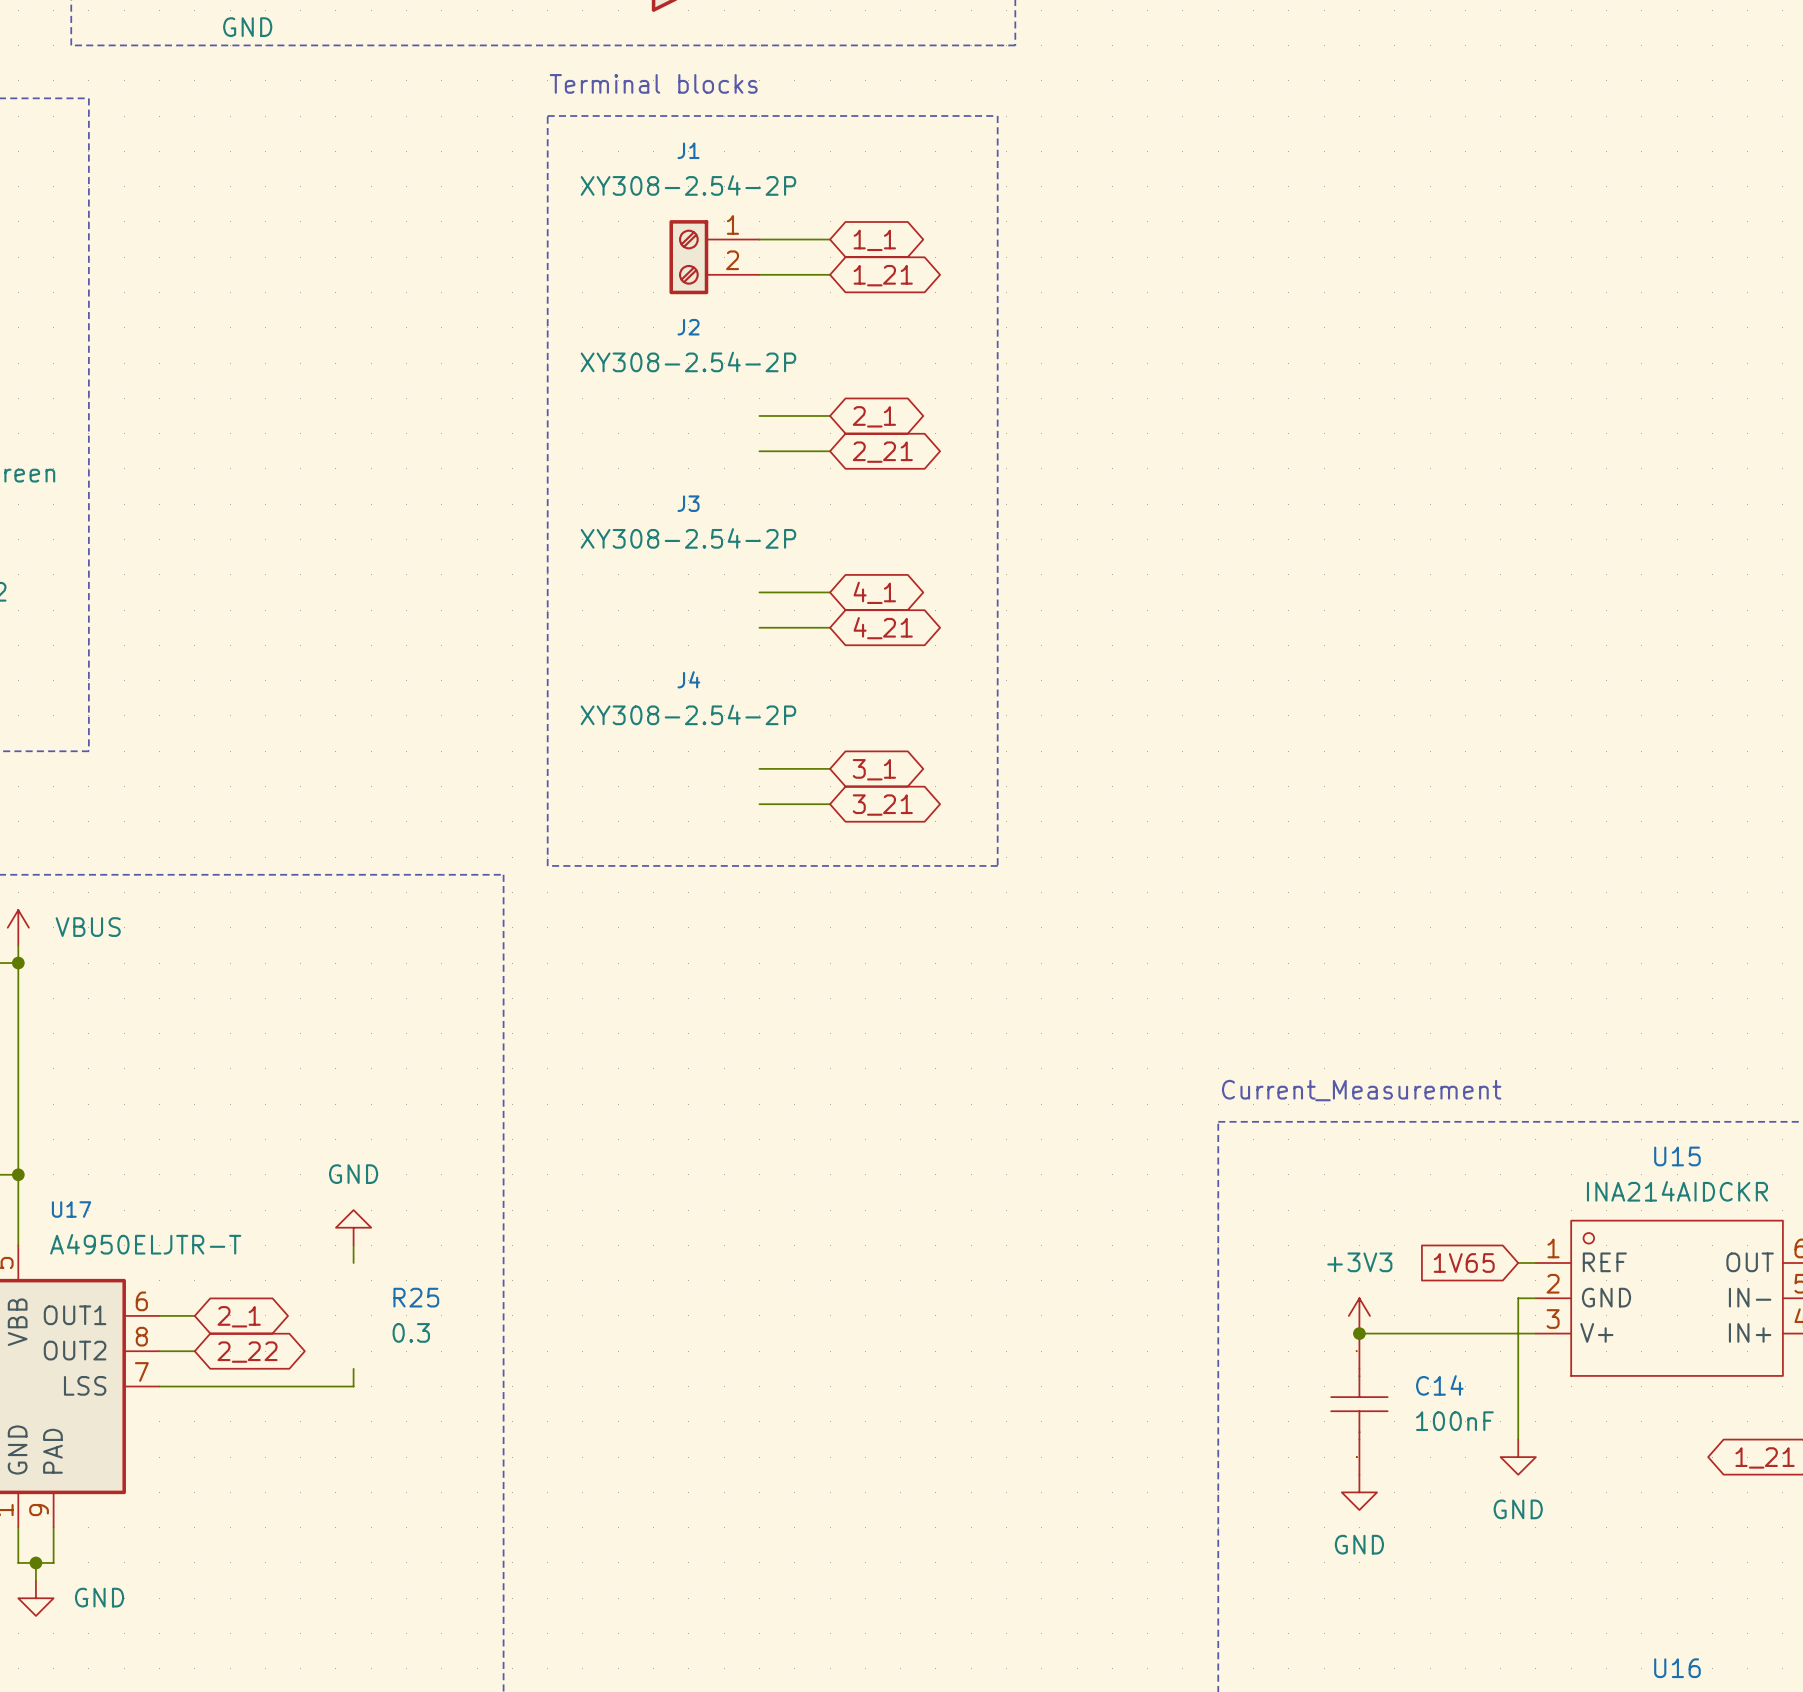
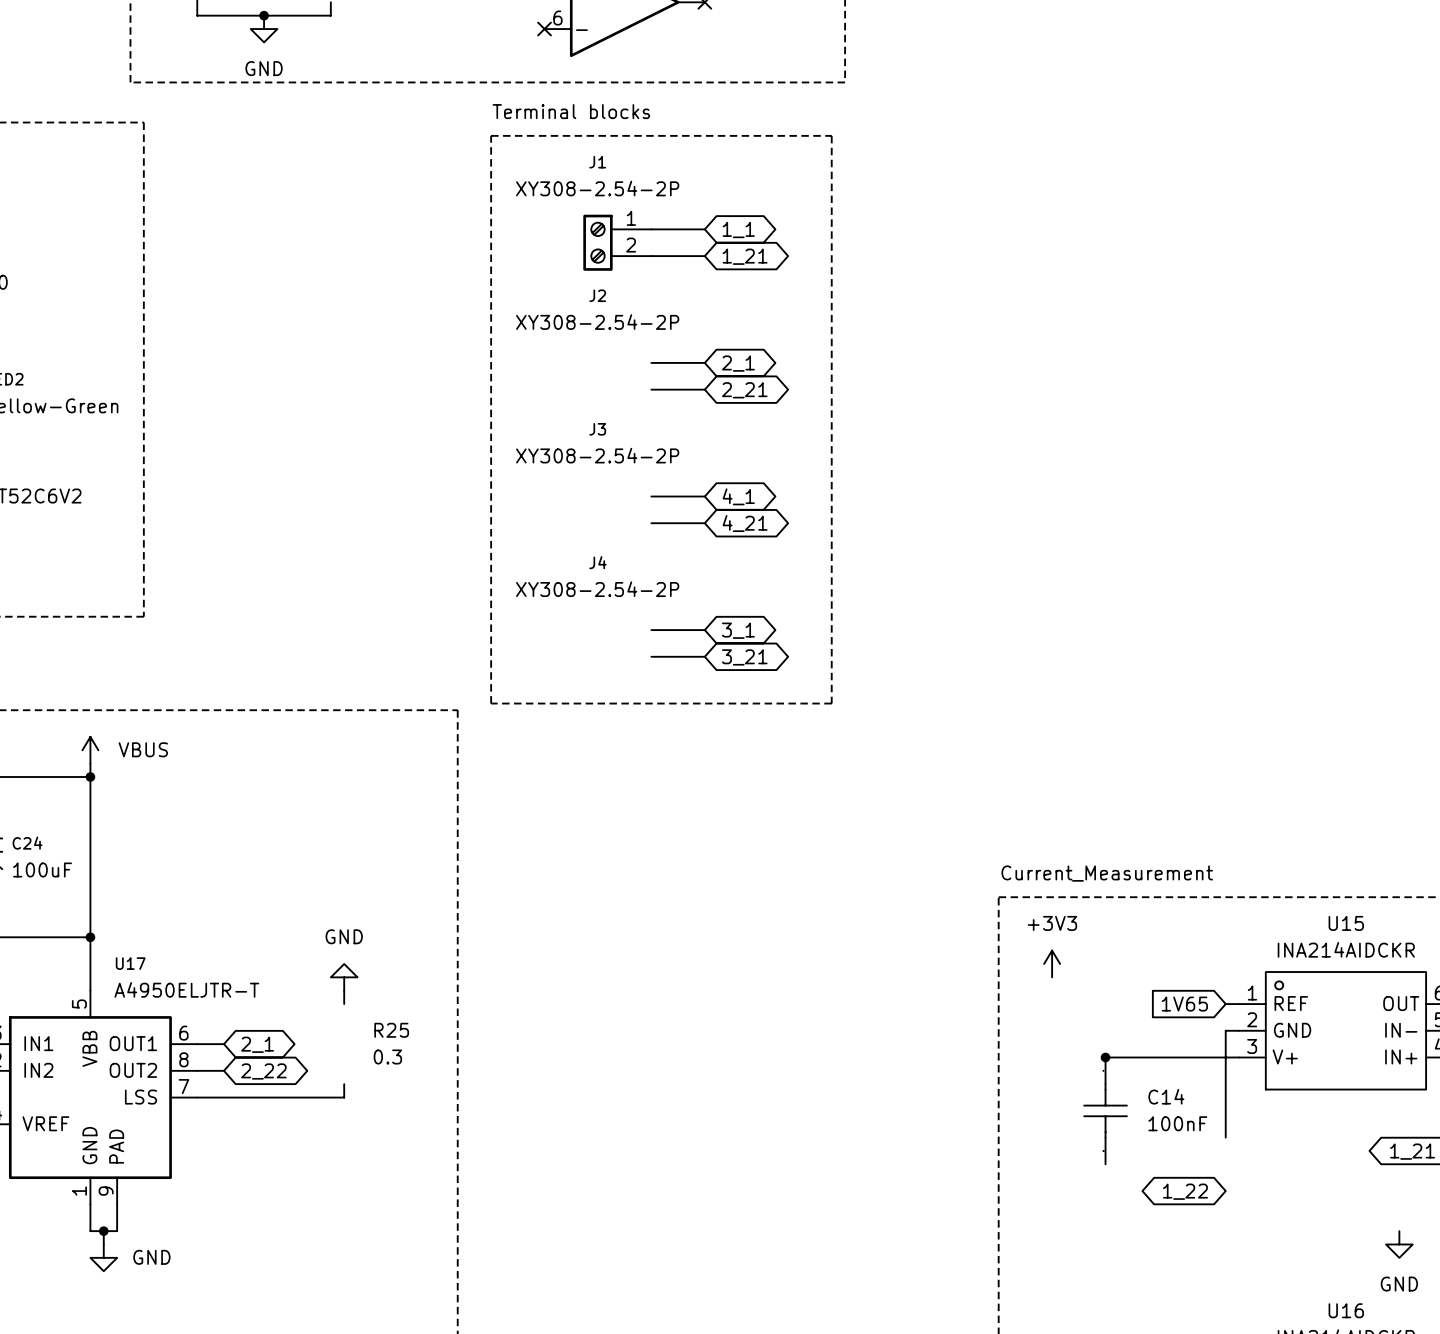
power symbol position: +3V3 (1359, 1315) -> +3V3 (1052, 964)
power symbol: GND (1518, 1457) -> none
power symbol: GND (1359, 1492) -> none
global label: none -> 1_22 (1185, 1191)
power symbol: none -> GND (1399, 1244)

